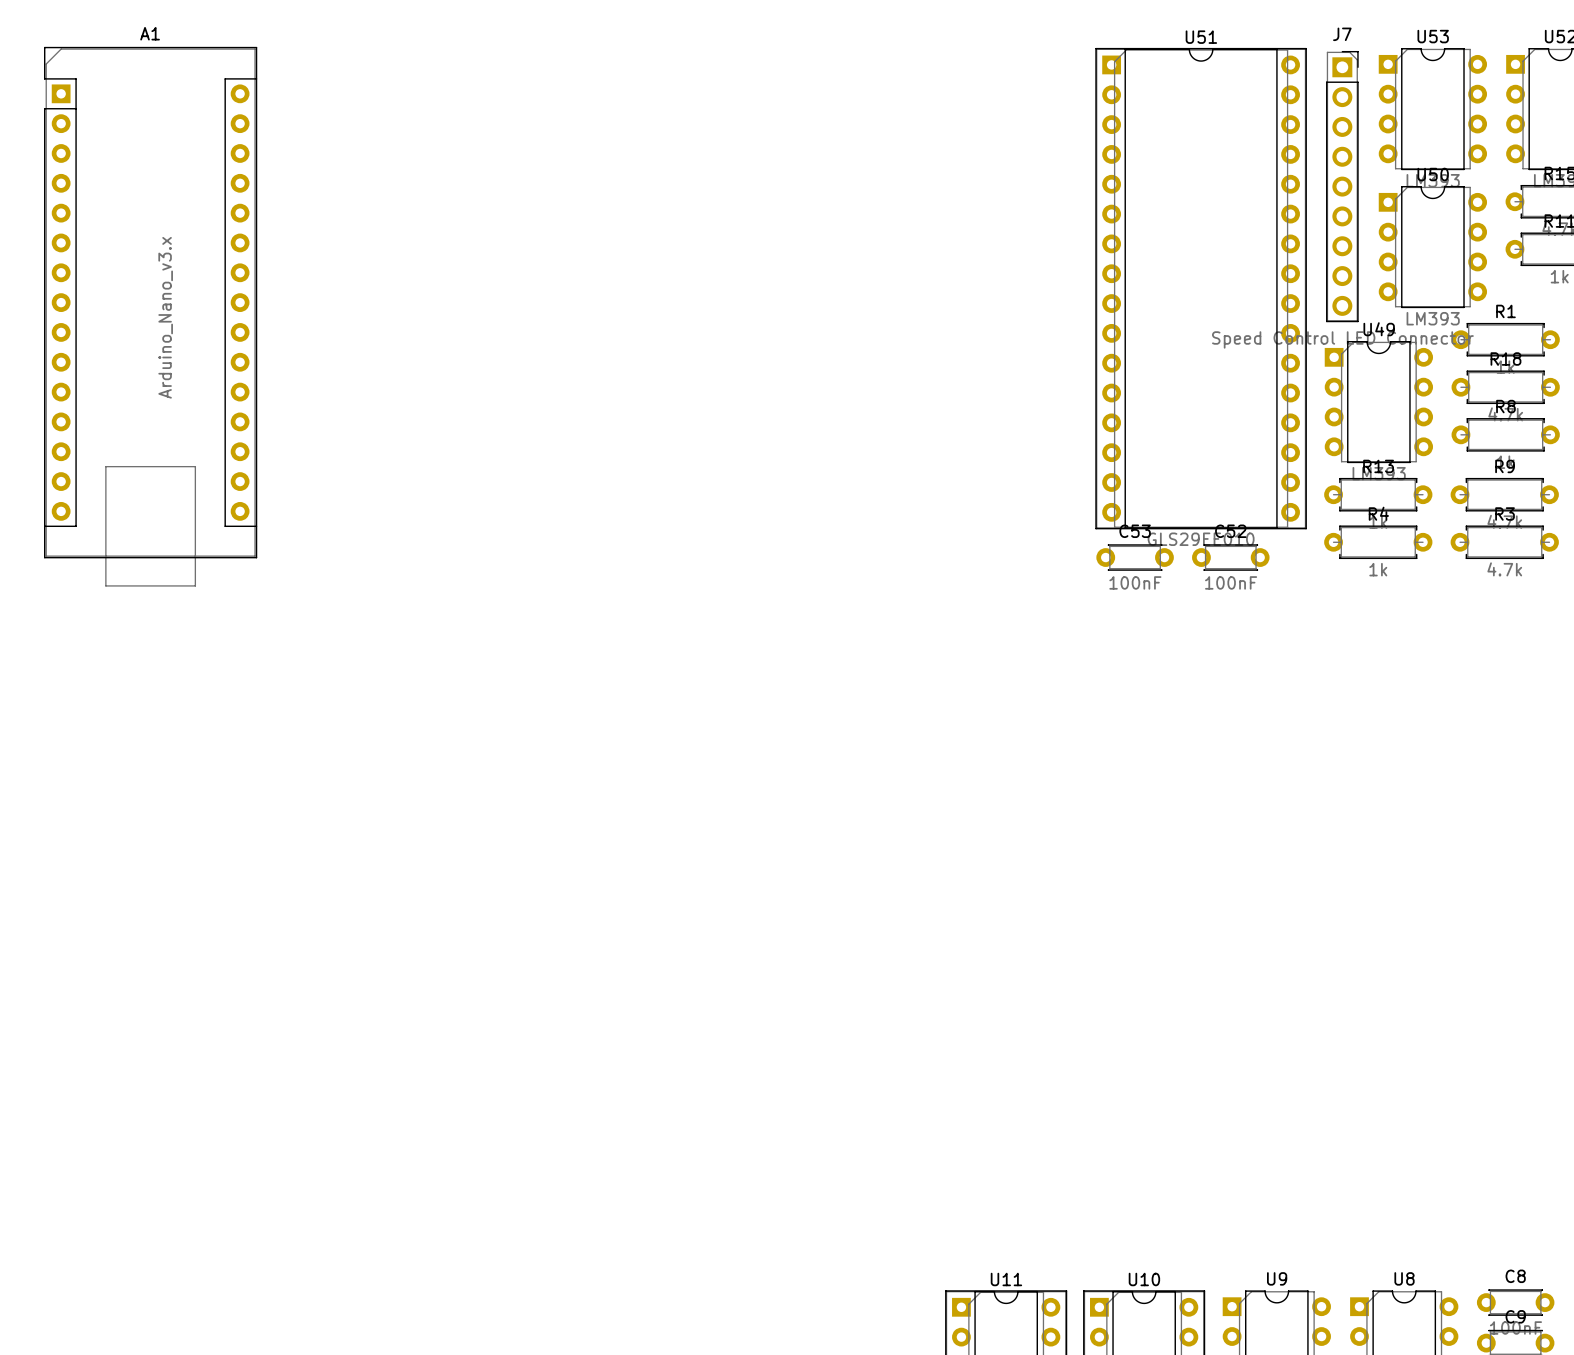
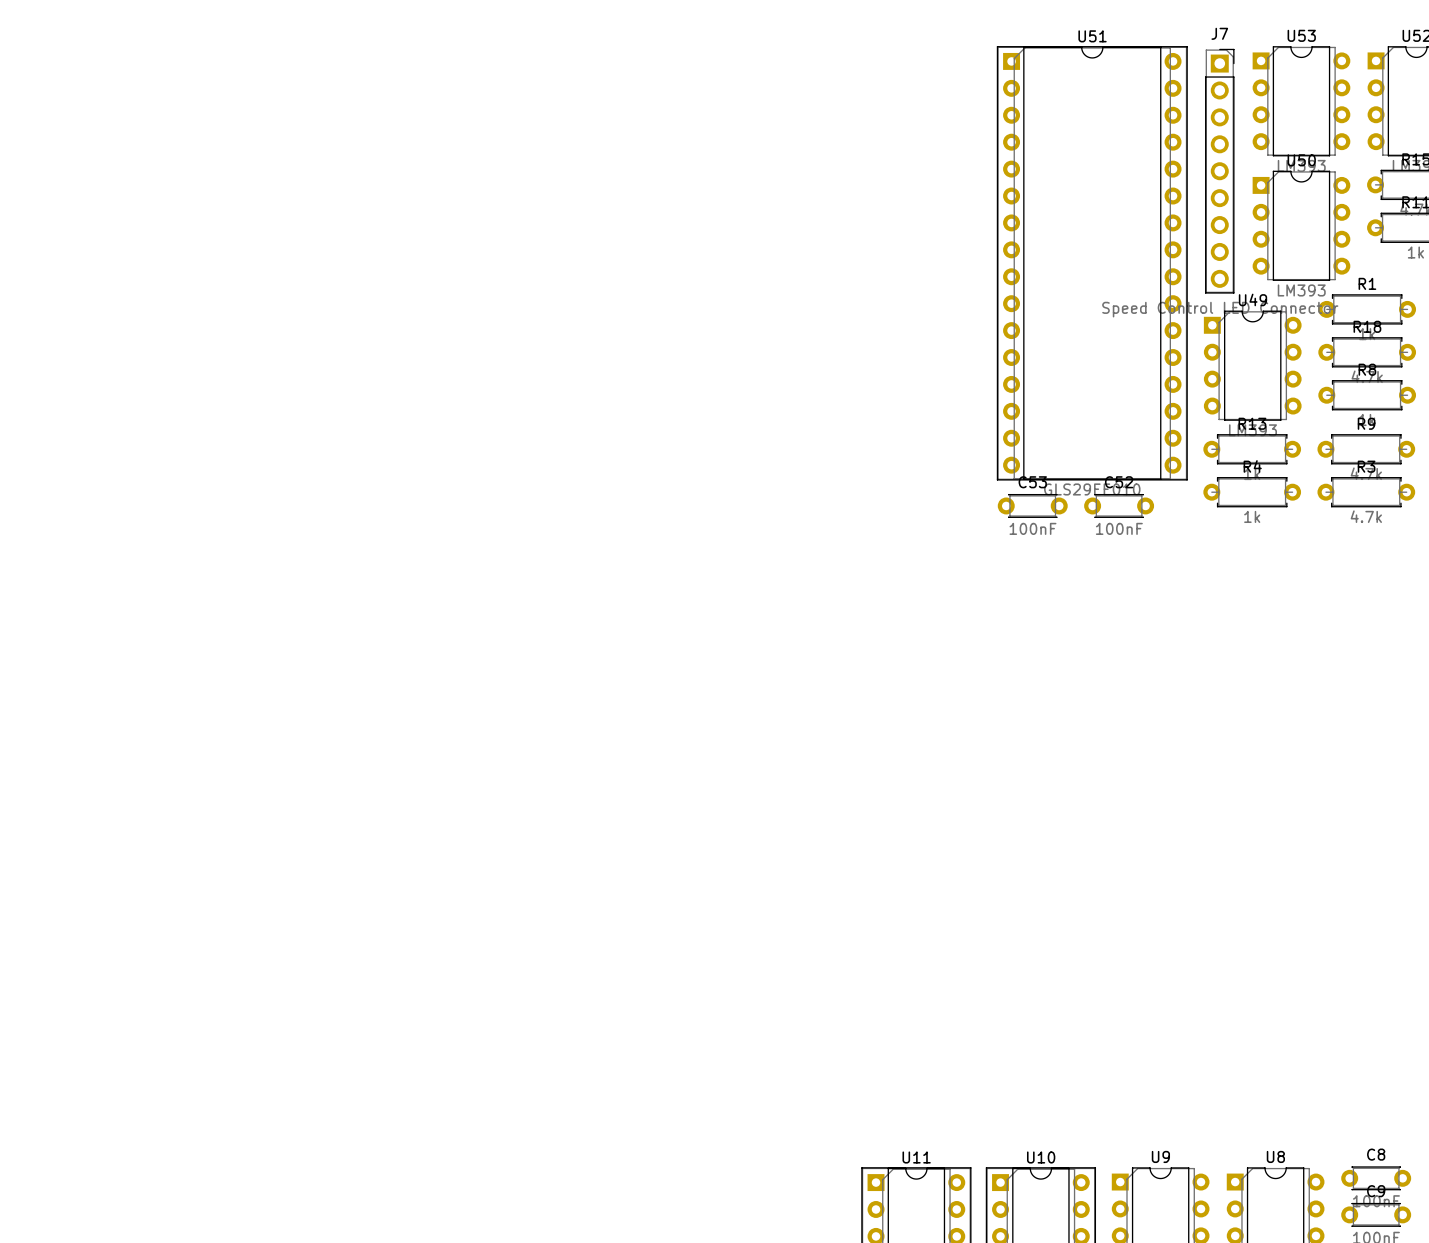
A1: Arduino_Nano_v3.x (150, 316) -> none

